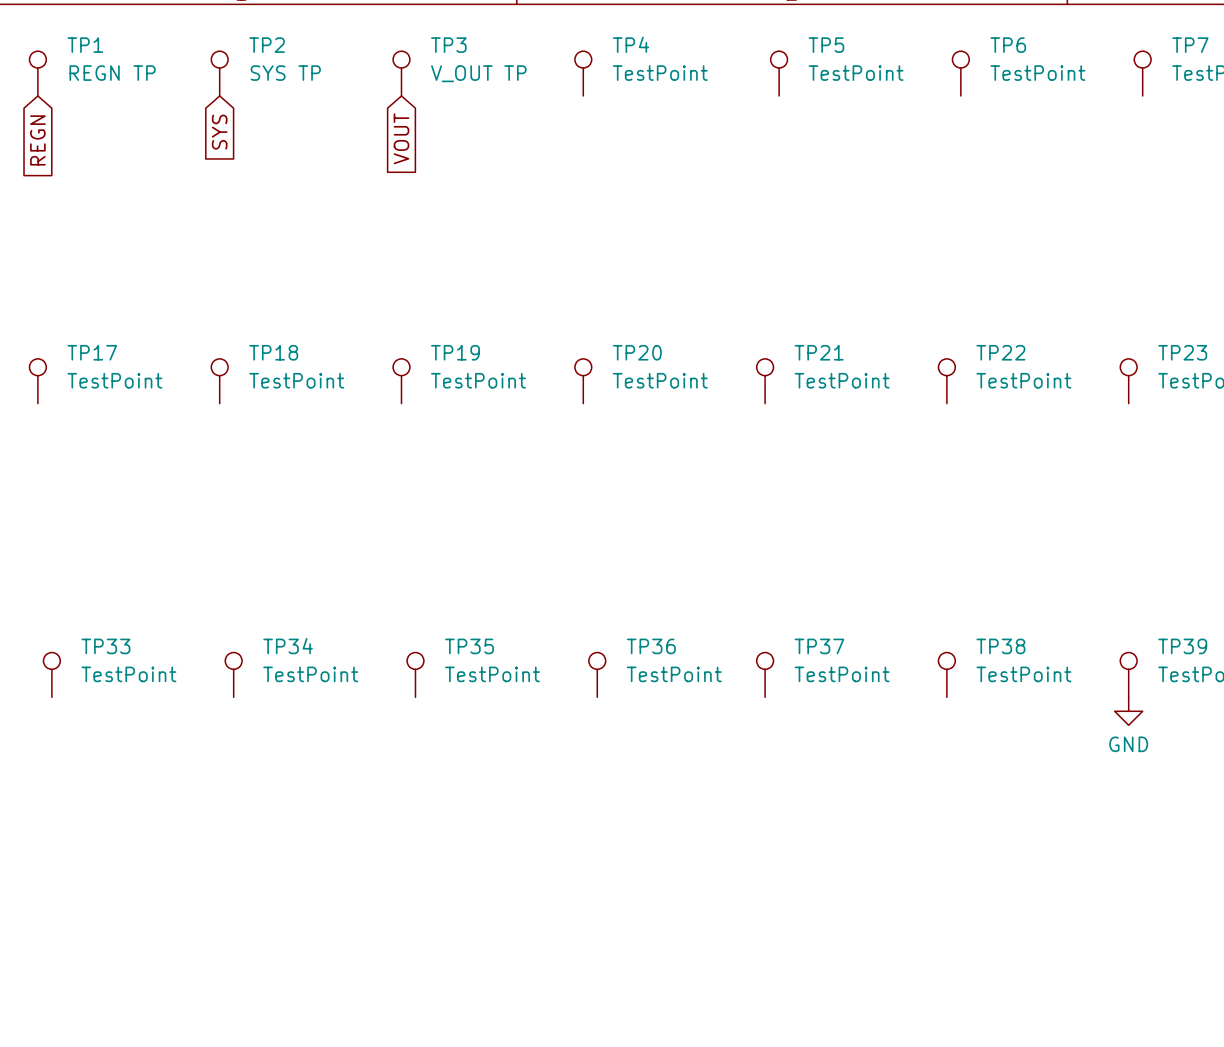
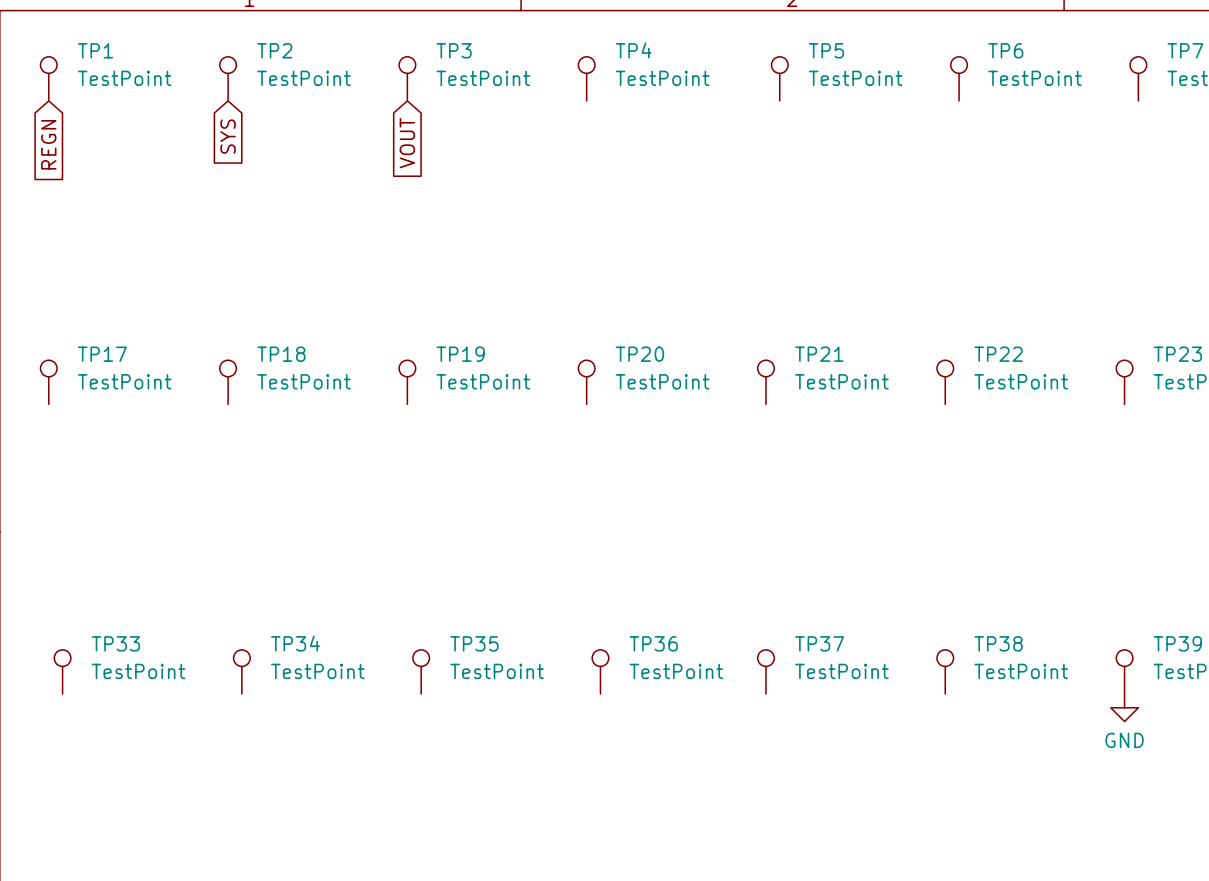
TP1 value: REGN TP (112, 73) -> TestPoint (124, 78)
TP2 value: SYS TP (285, 73) -> TestPoint (304, 78)
TP3 value: V_OUT TP (478, 73) -> TestPoint (483, 78)

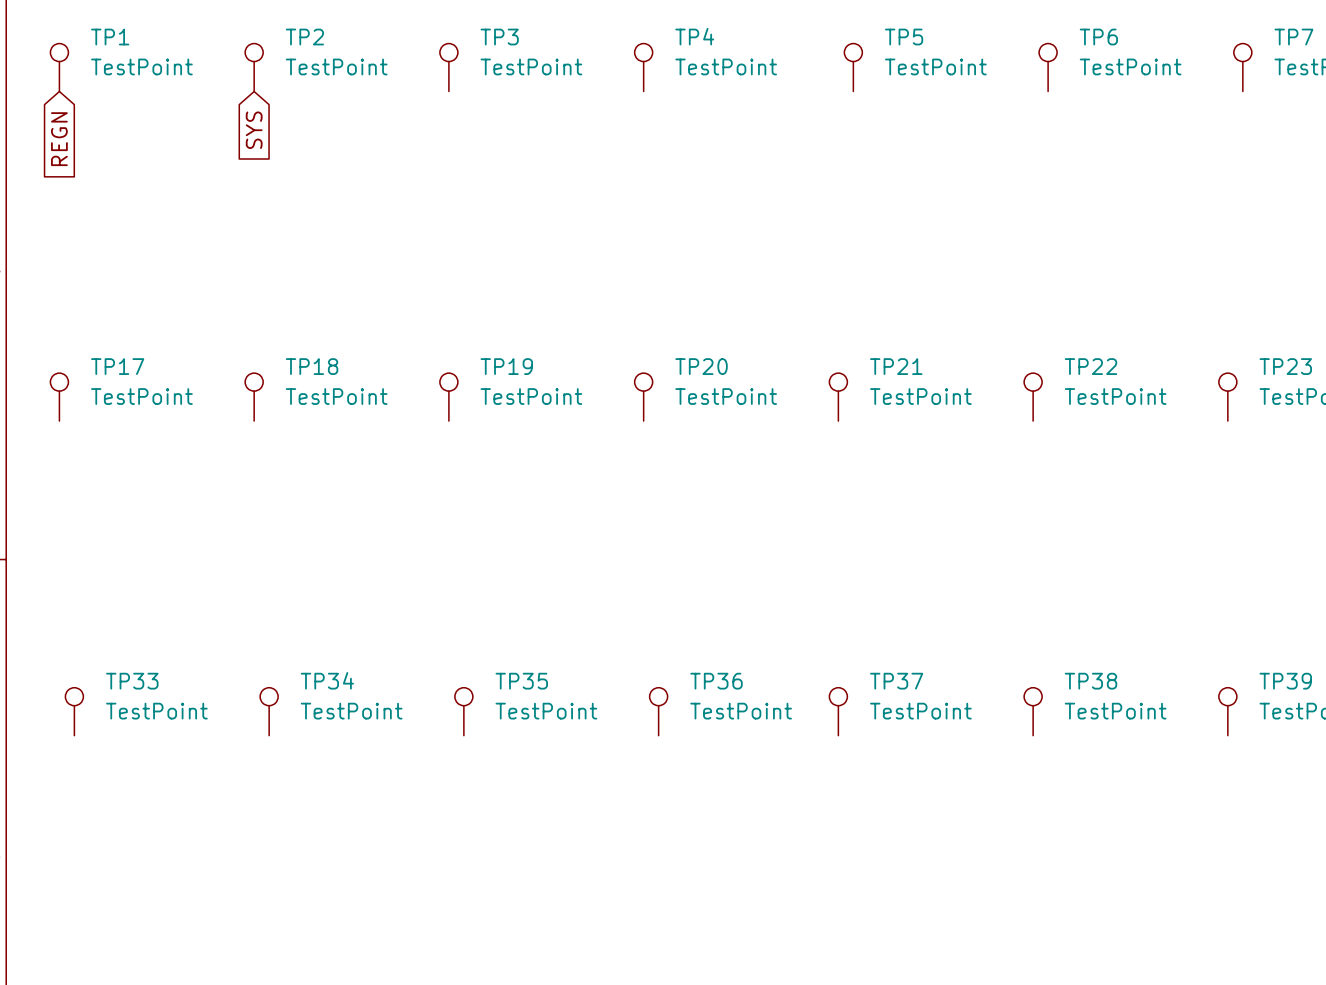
global label: VOUT (407, 143) -> none
power symbol: GND (1124, 707) -> none

